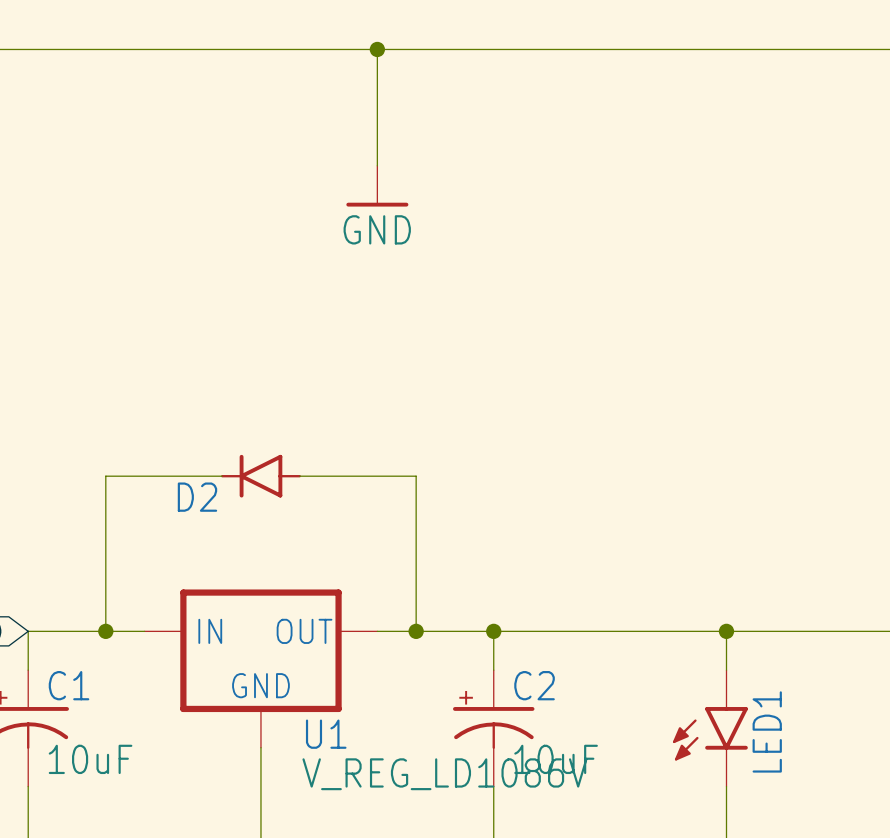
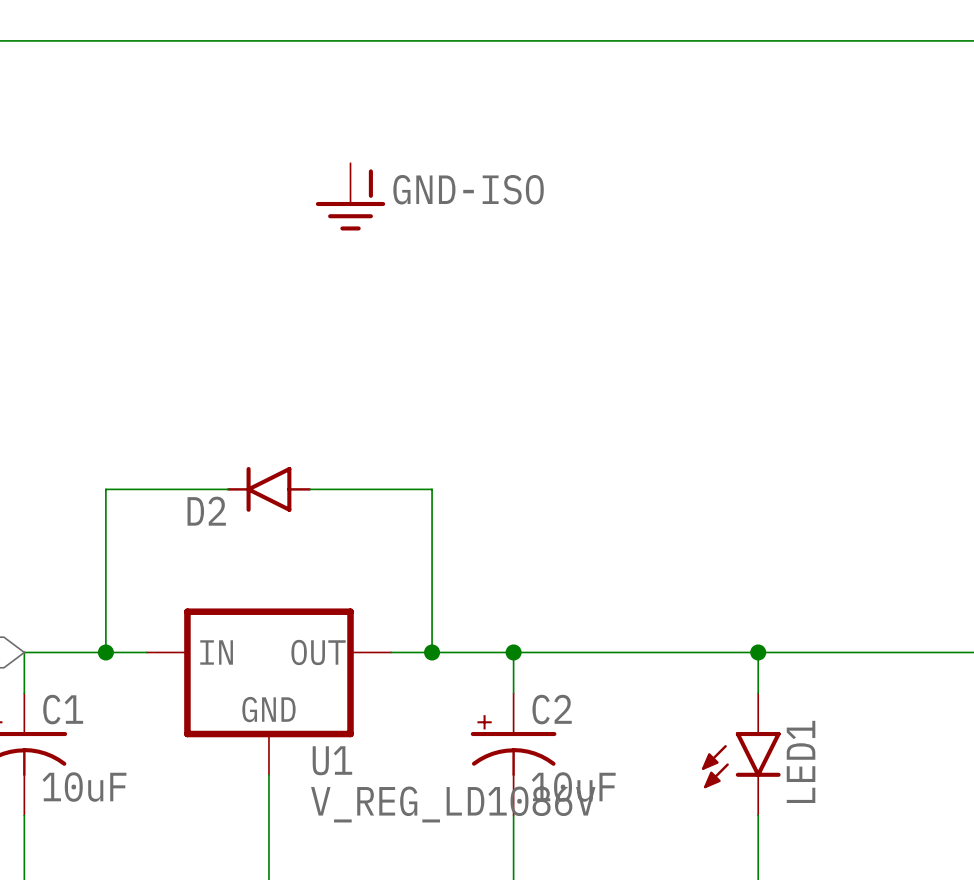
wire: (377, 49) (377, 165) -> none
junction: (377, 49) -> none
power symbol: GND (377, 186) -> none
power symbol: none -> GND-ISO (350, 196)

